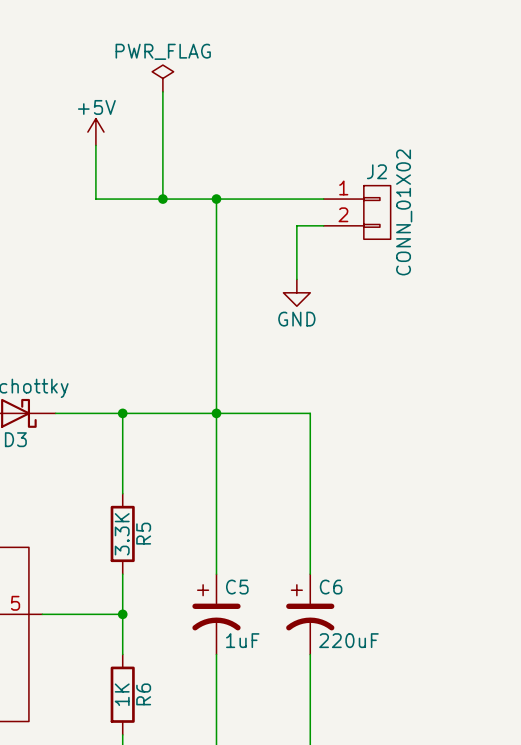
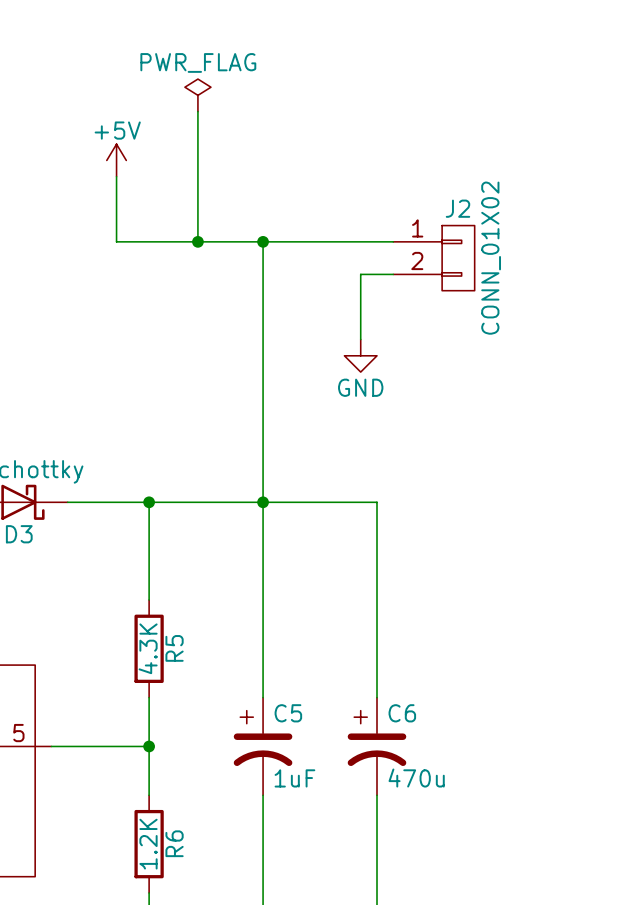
R5 value: 3.3K (122, 534) -> 4.3K (148, 648)
C6 value: 220uF (348, 640) -> 470u (416, 778)
R6 value: 1K (122, 694) -> 1.2K (148, 844)

